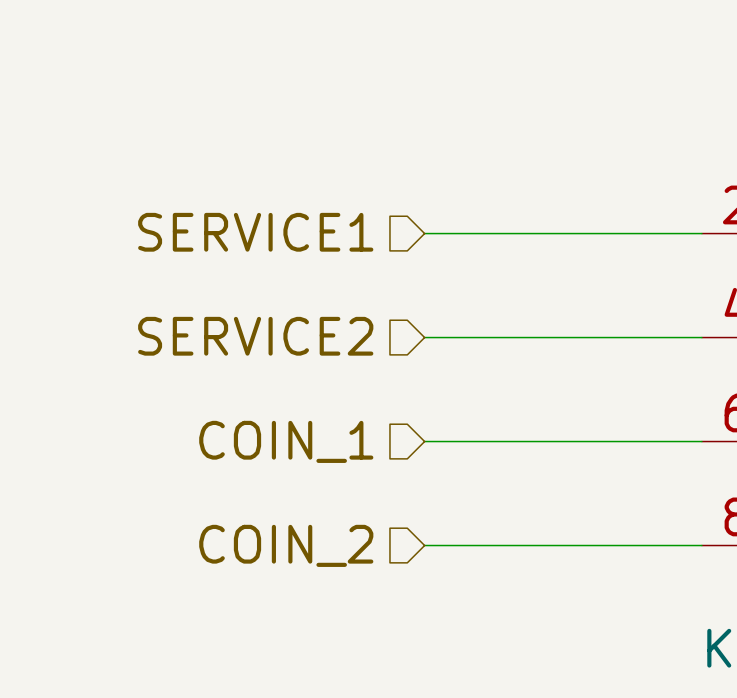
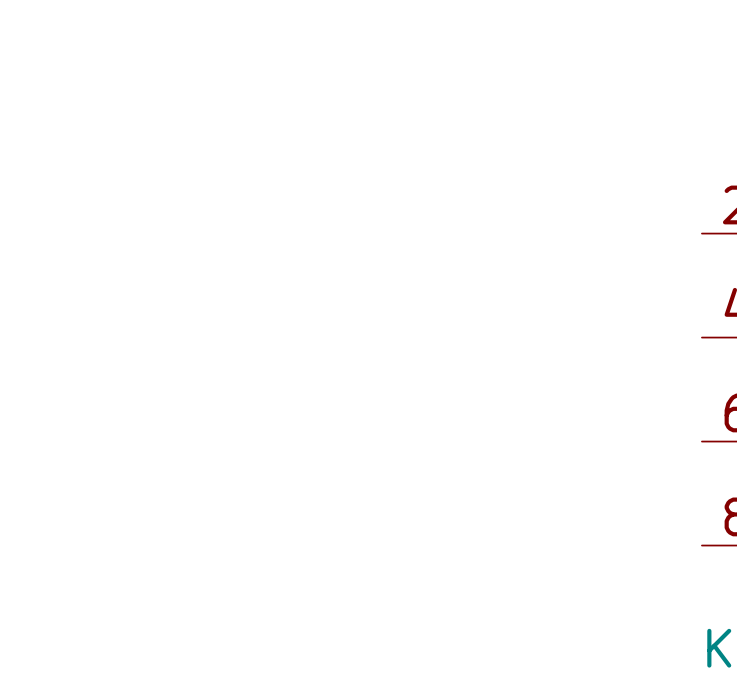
hierarchical label: SERVICE1 (255, 232) -> none
wire: (424, 233) (701, 233) -> none
hierarchical label: SERVICE2 (255, 336) -> none
wire: (424, 337) (701, 337) -> none
hierarchical label: COIN_1 (286, 441) -> none
wire: (424, 441) (701, 441) -> none
hierarchical label: COIN_2 (286, 545) -> none
wire: (424, 545) (701, 545) -> none

